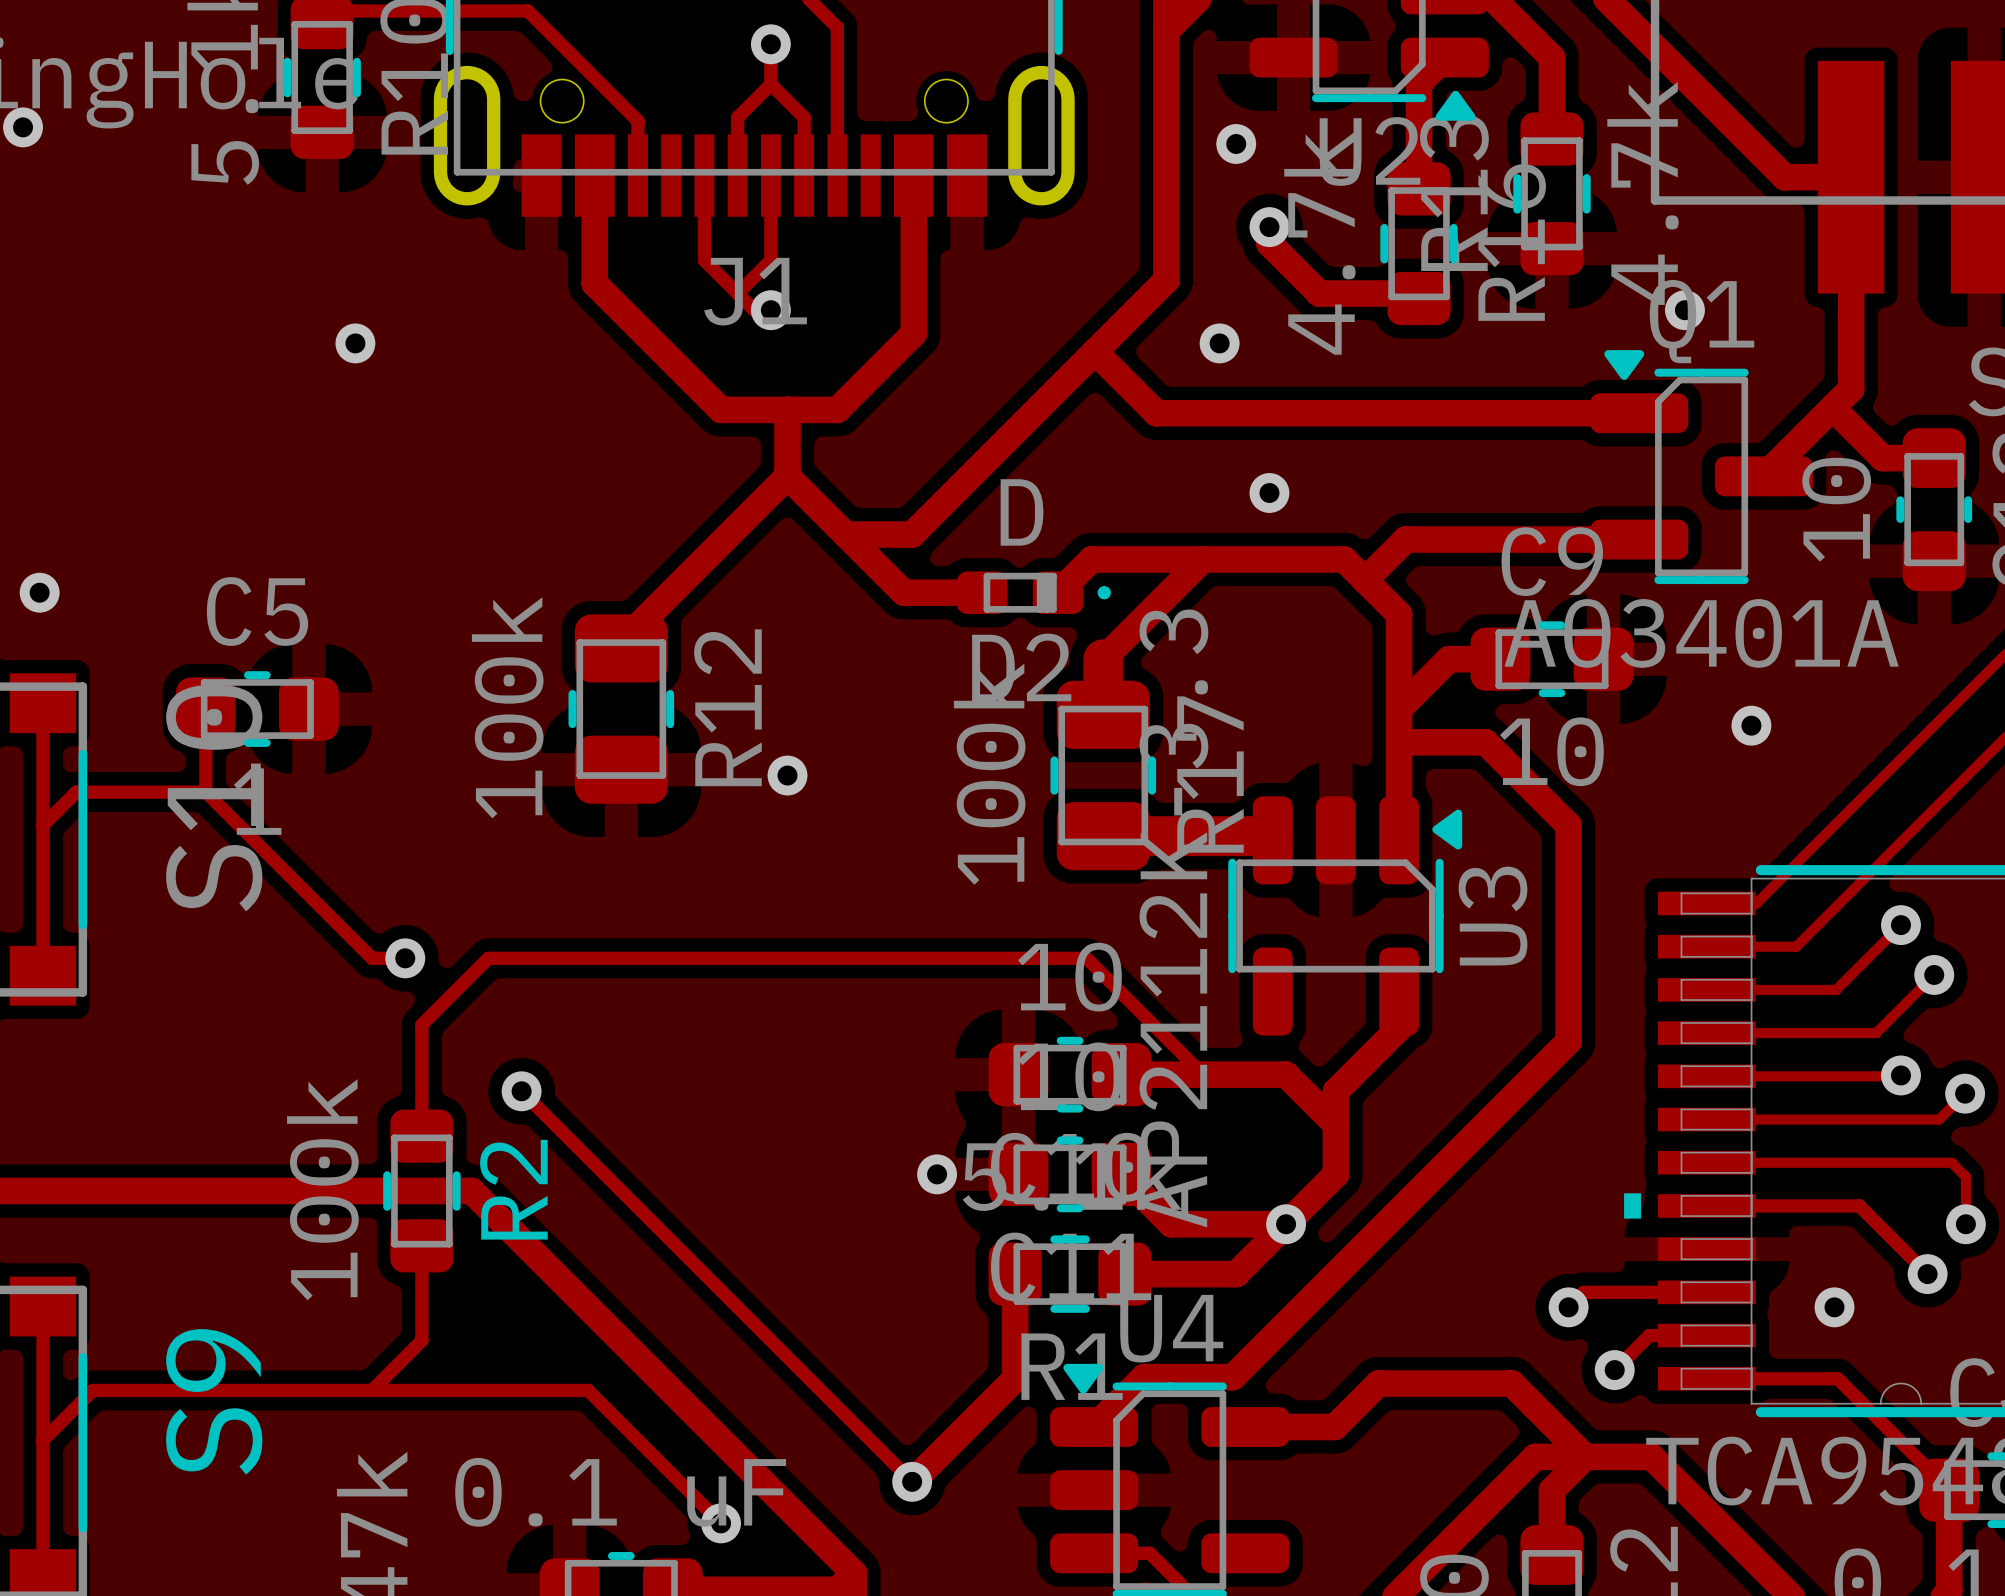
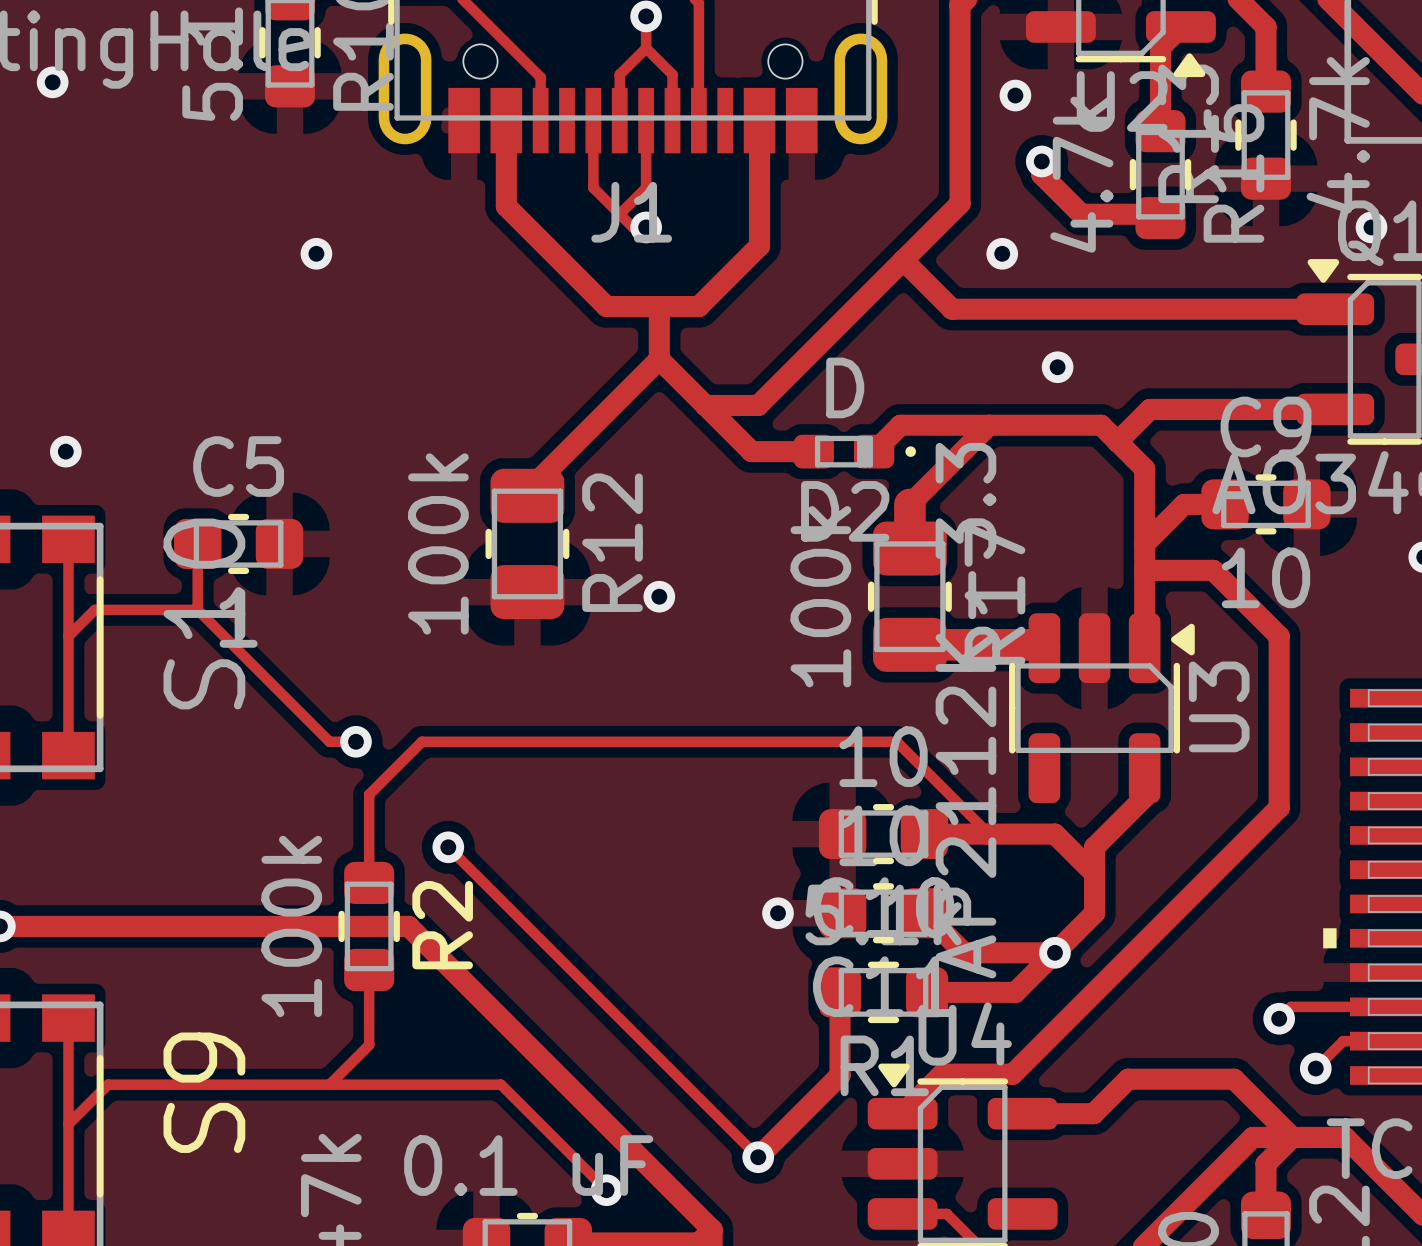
via position: (1269, 493) -> (1057, 367)

